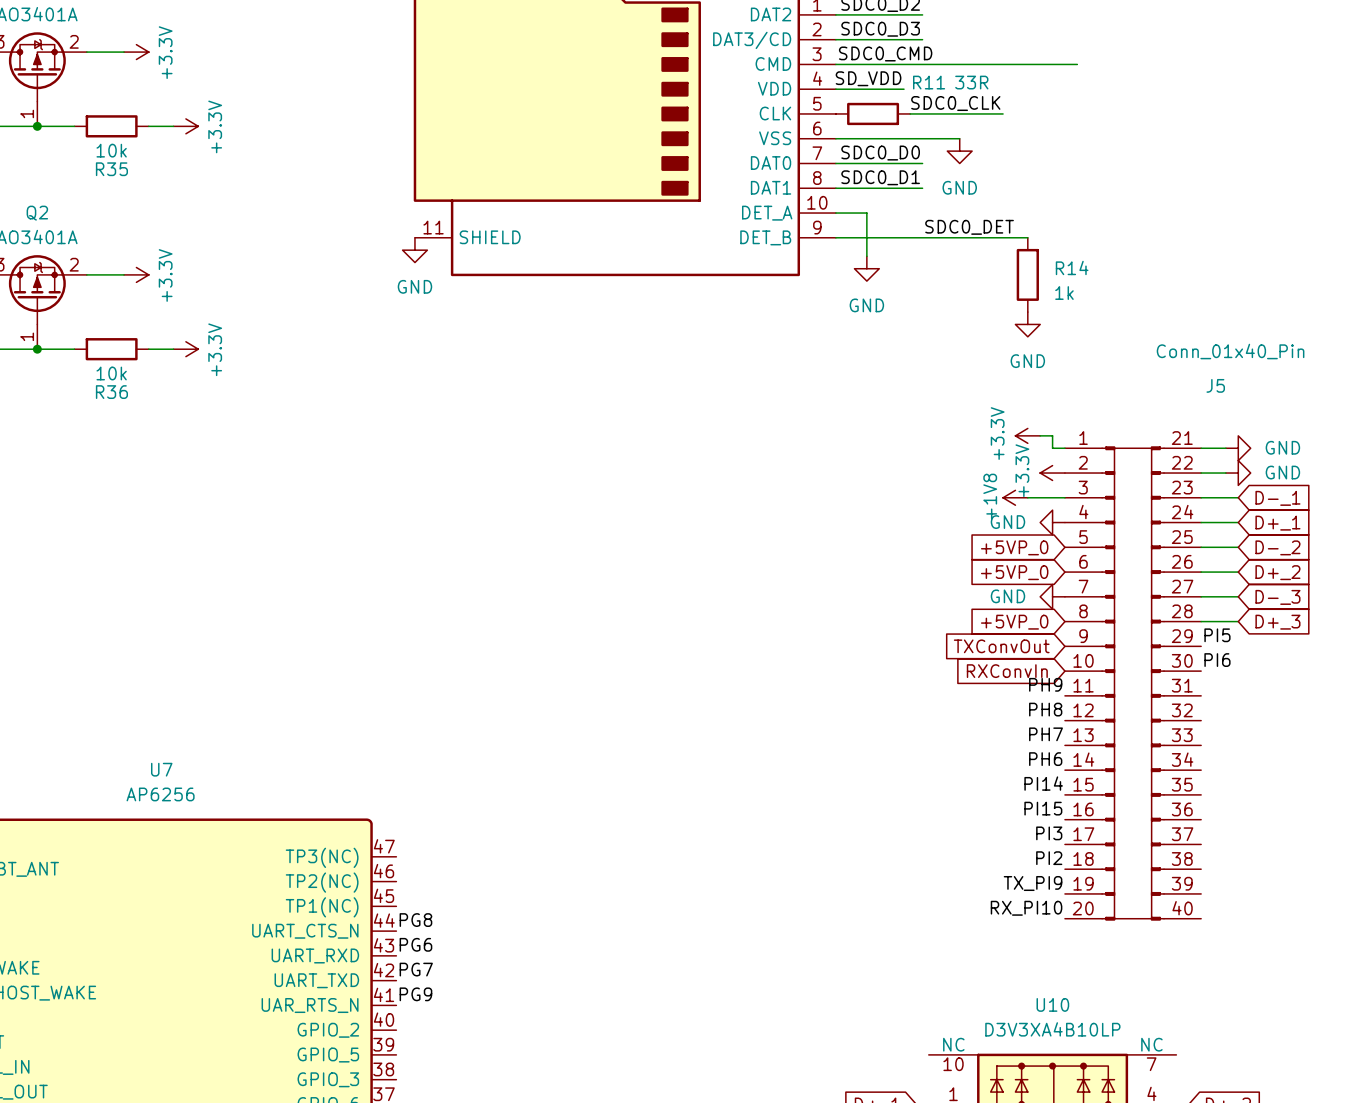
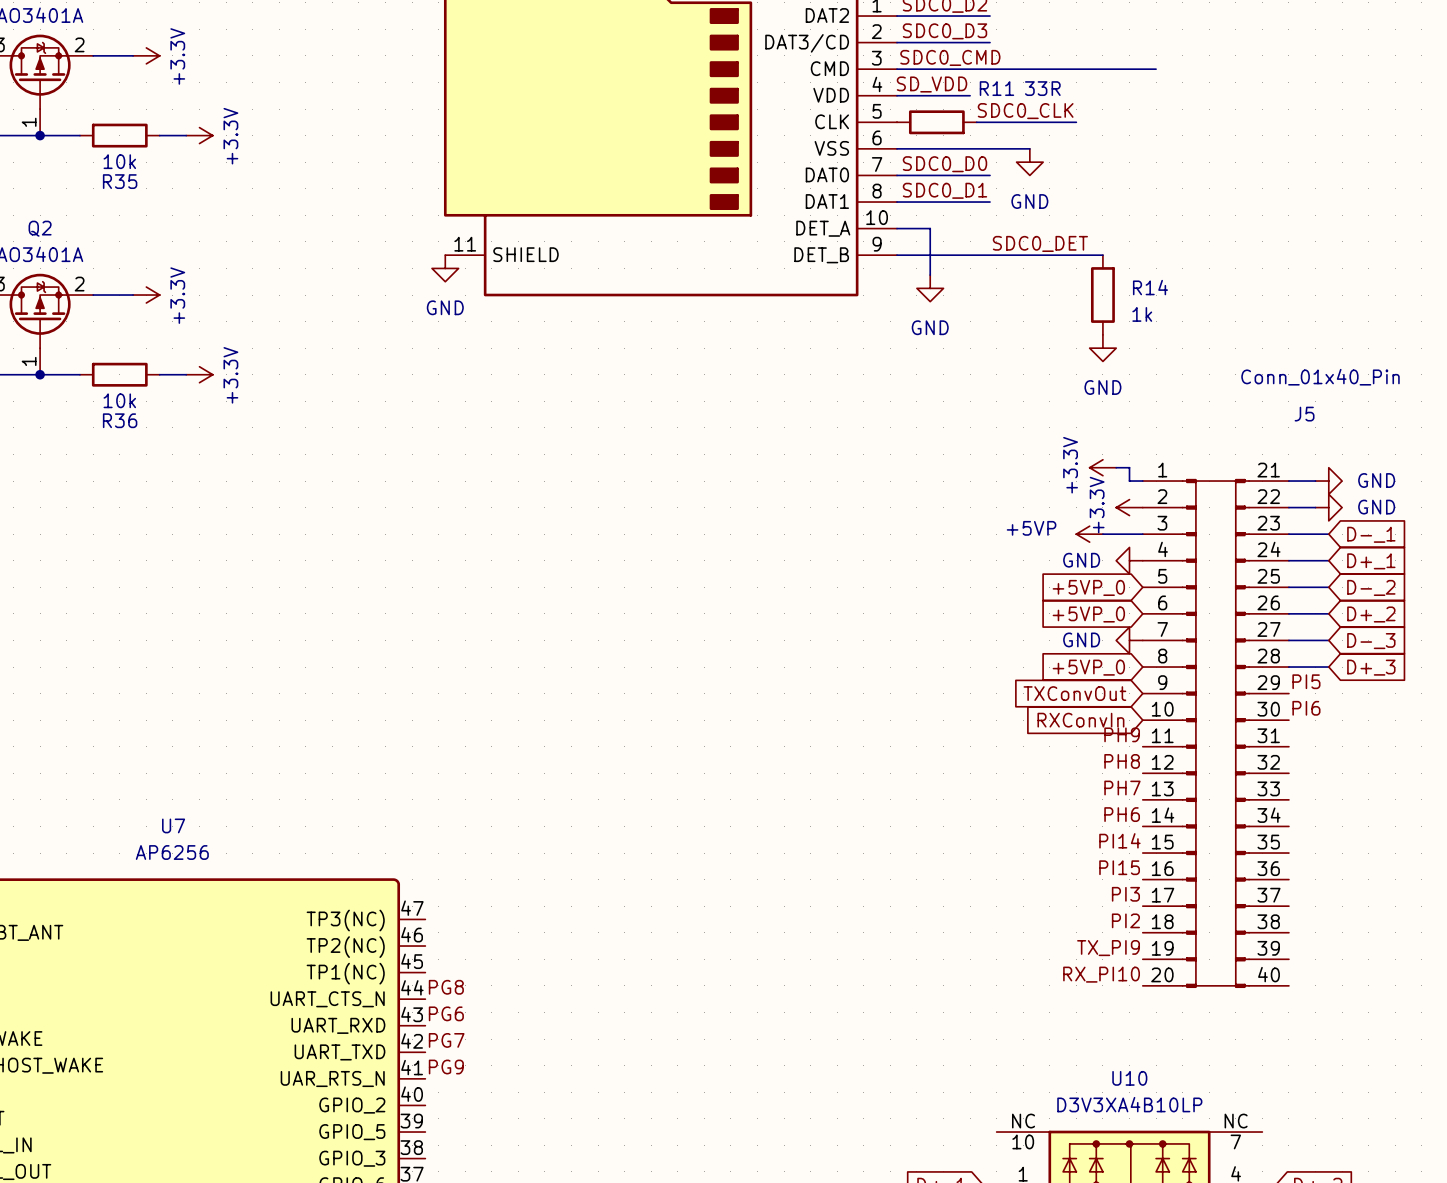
power symbol: +1V8 (1015, 497) -> +5VP (1089, 534)

